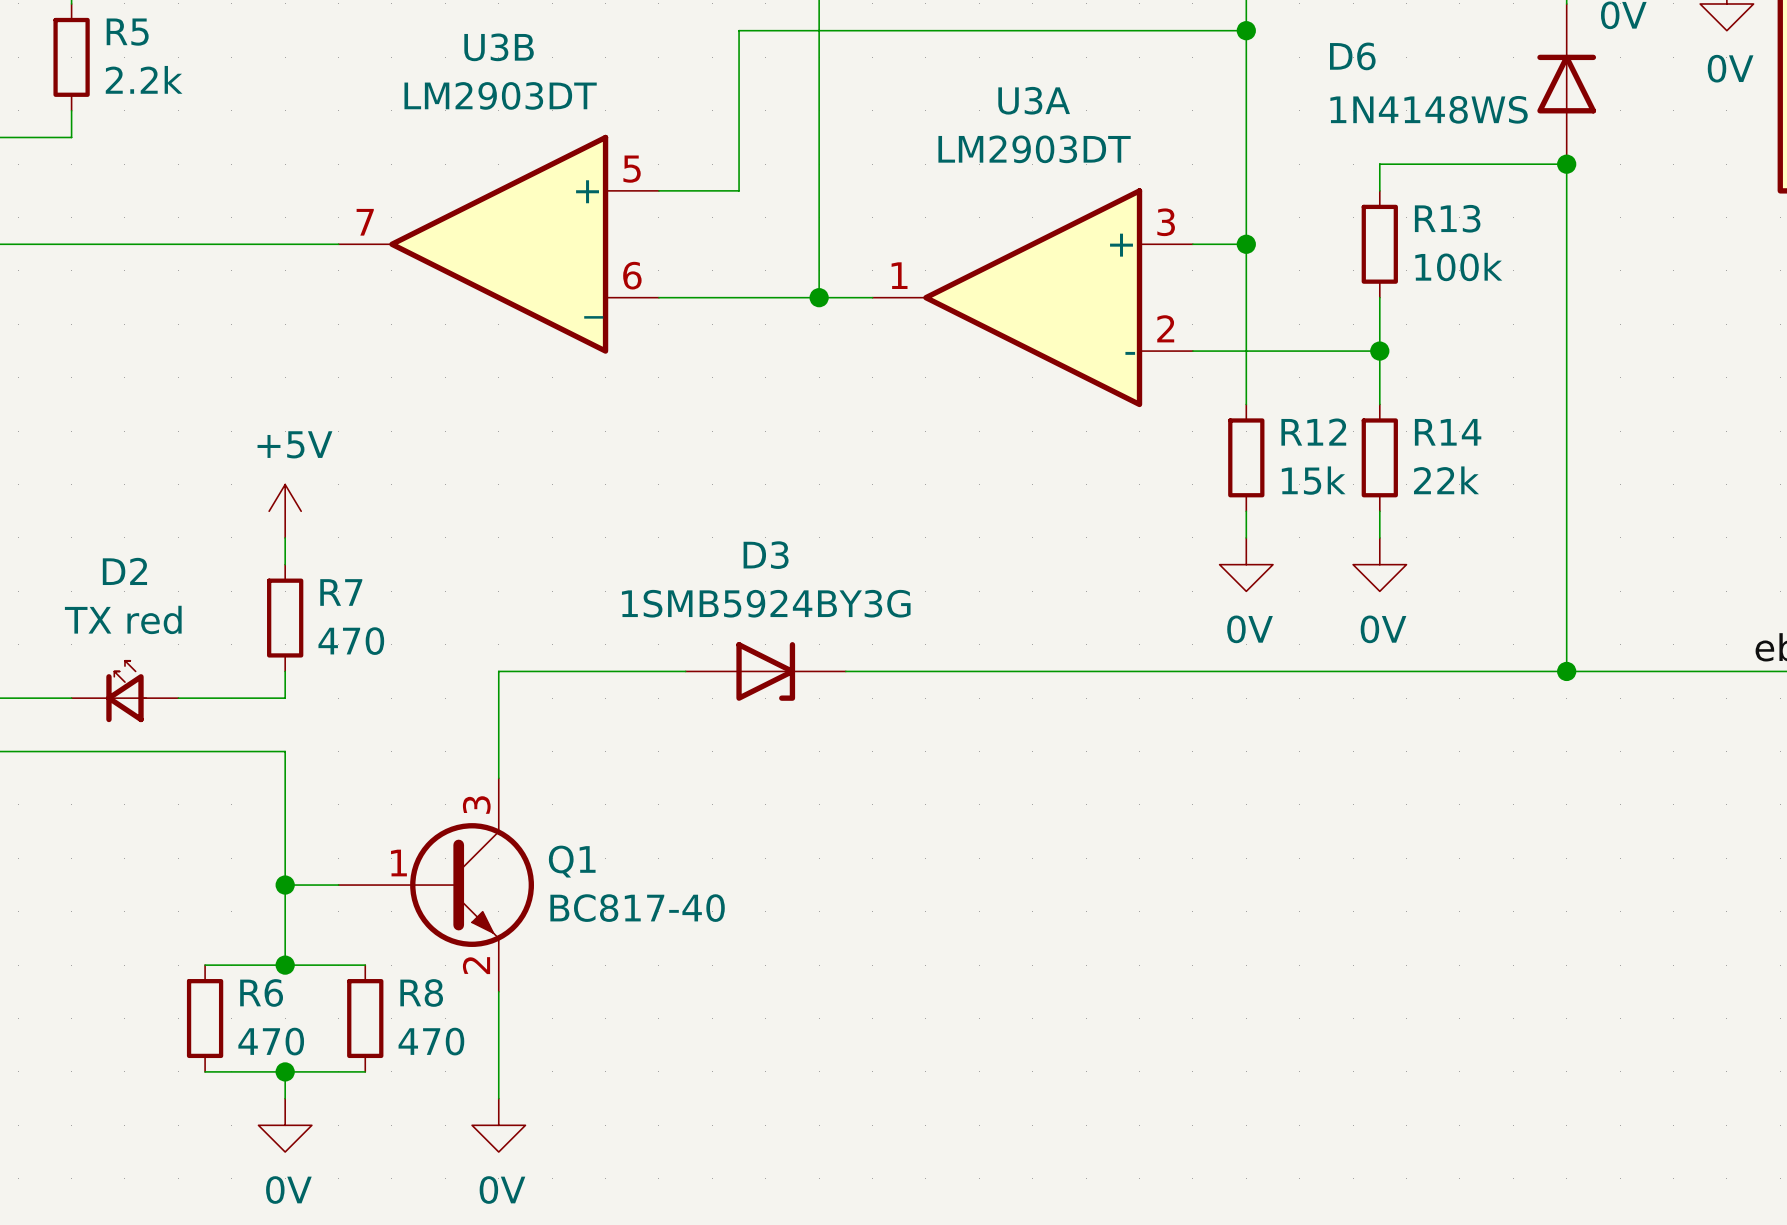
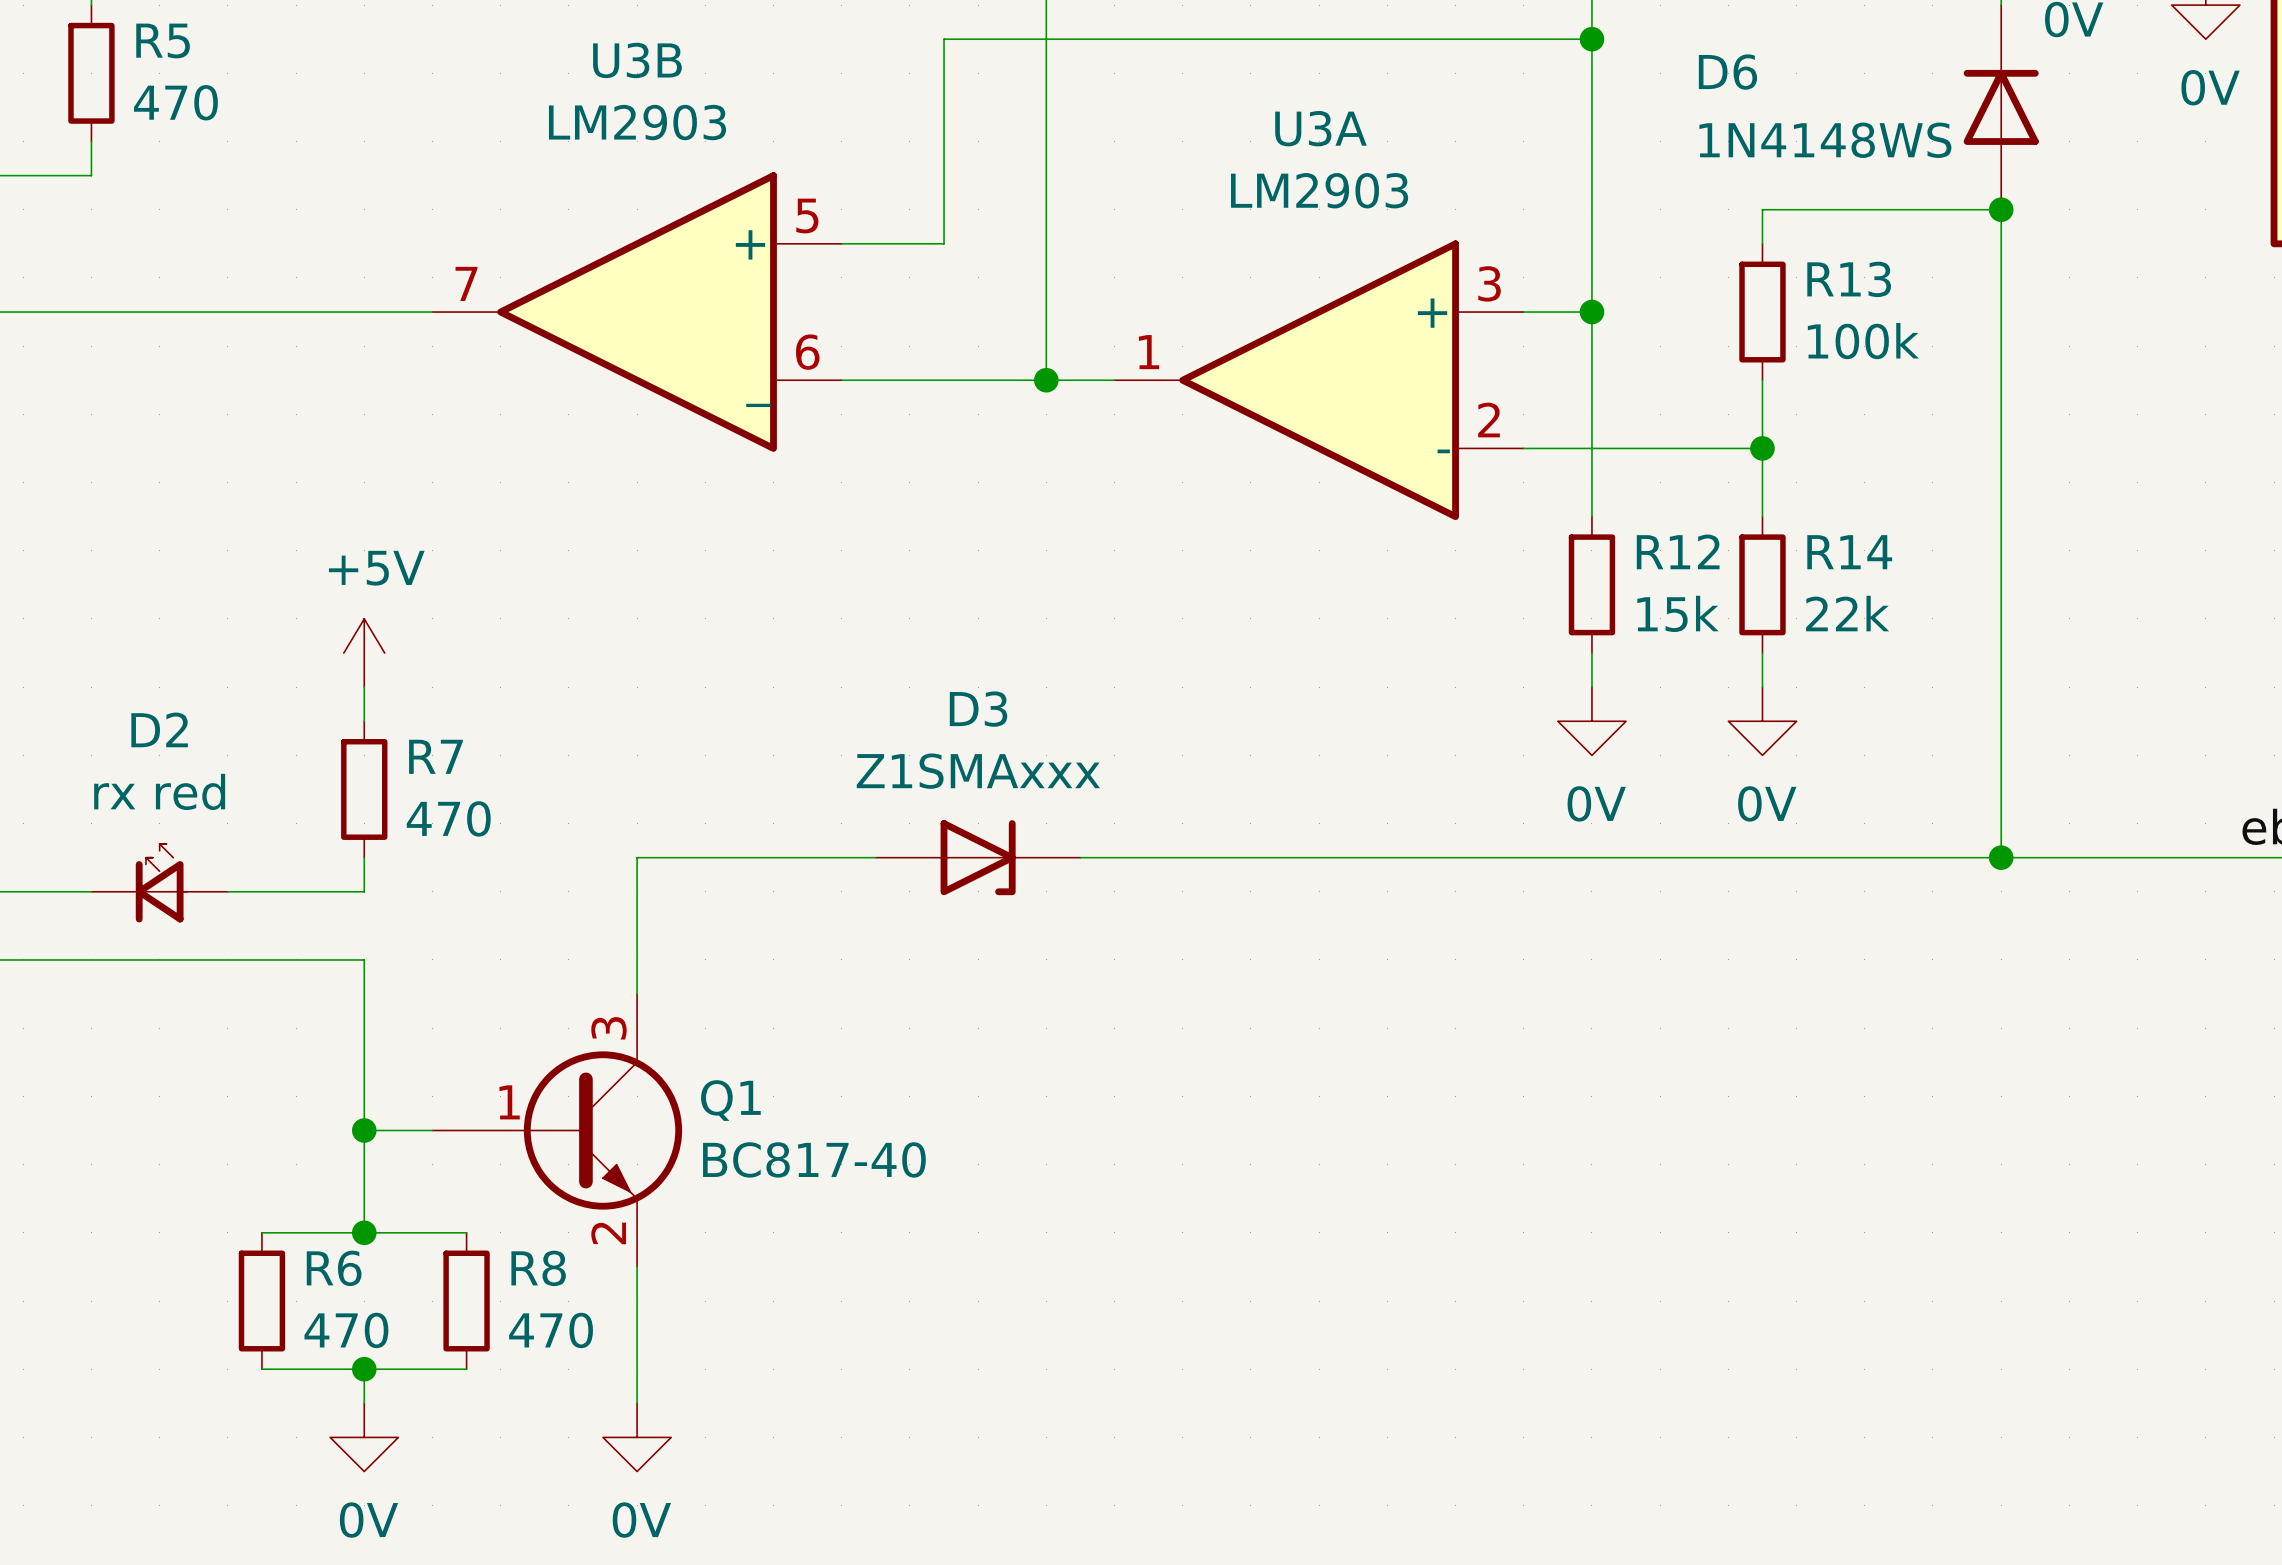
R5 value: 2.2k (144, 79) -> 470 (175, 102)
U3B value: LM2903DT (500, 95) -> LM2903 (637, 122)
U3A value: LM2903DT (1034, 149) -> LM2903 (1319, 190)
D3 value: 1SMB5924BY3G (766, 603) -> Z1SMAxxx (978, 771)
D2 value: TX red (123, 619) -> rx red (159, 791)

